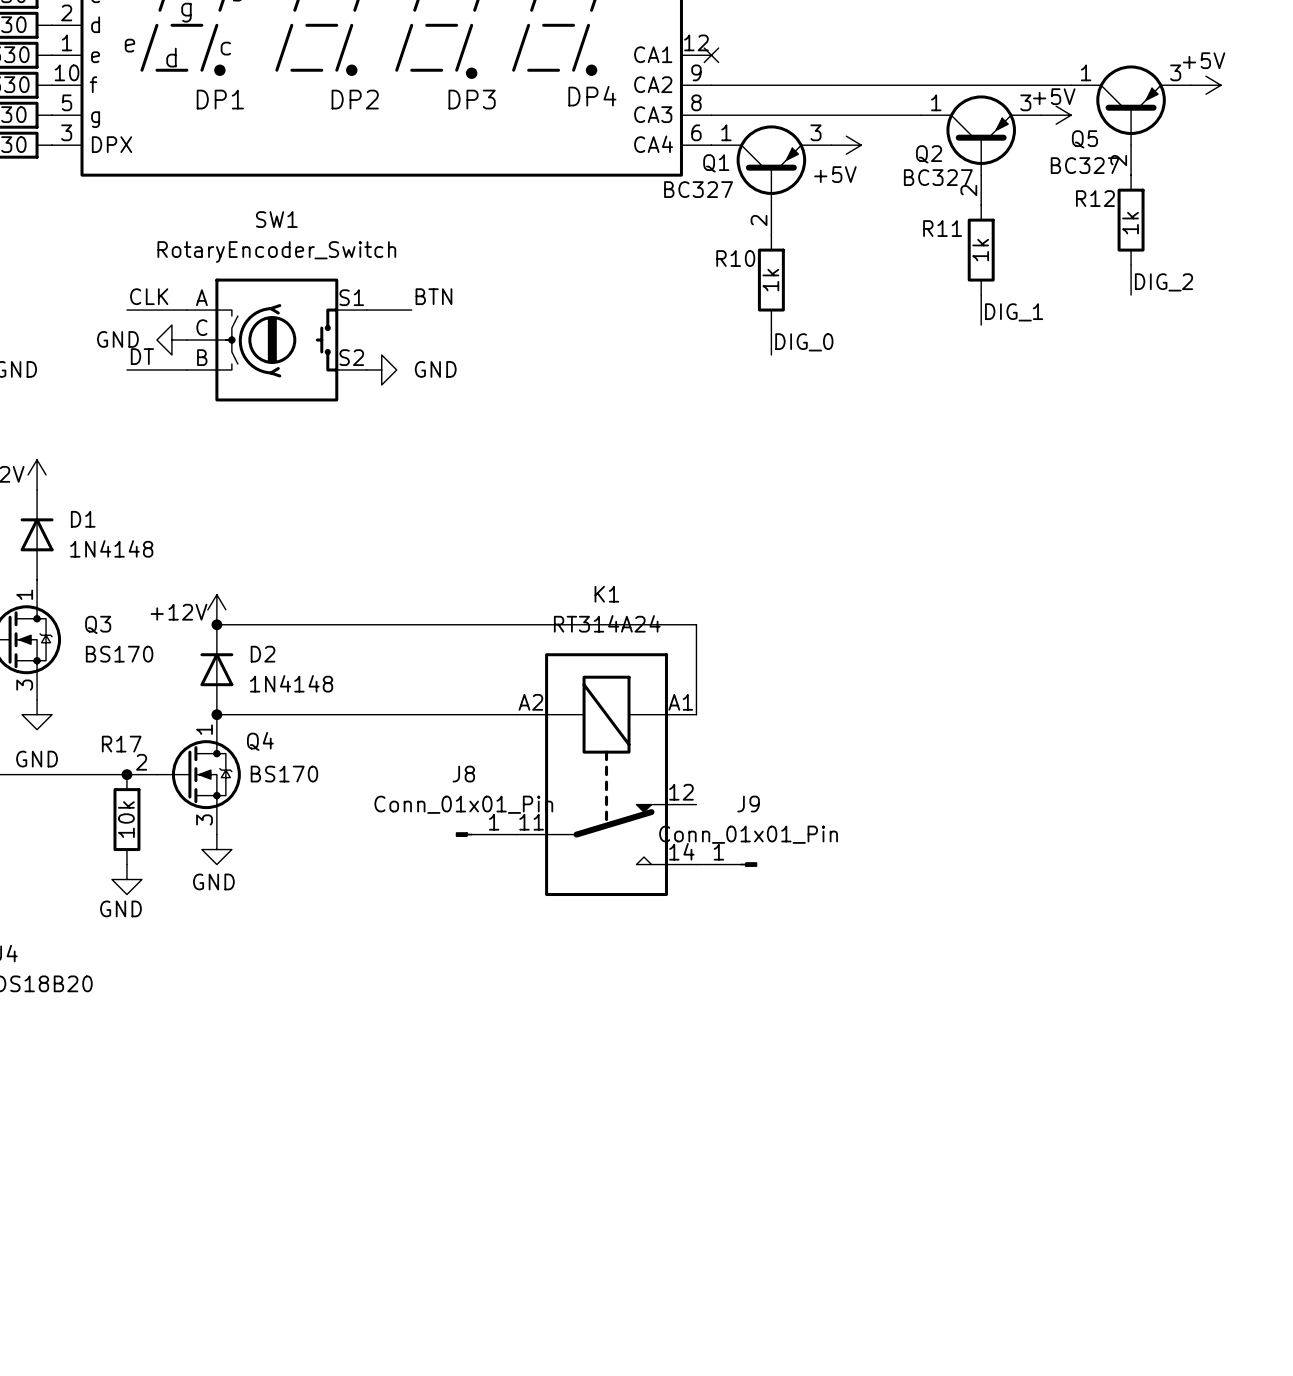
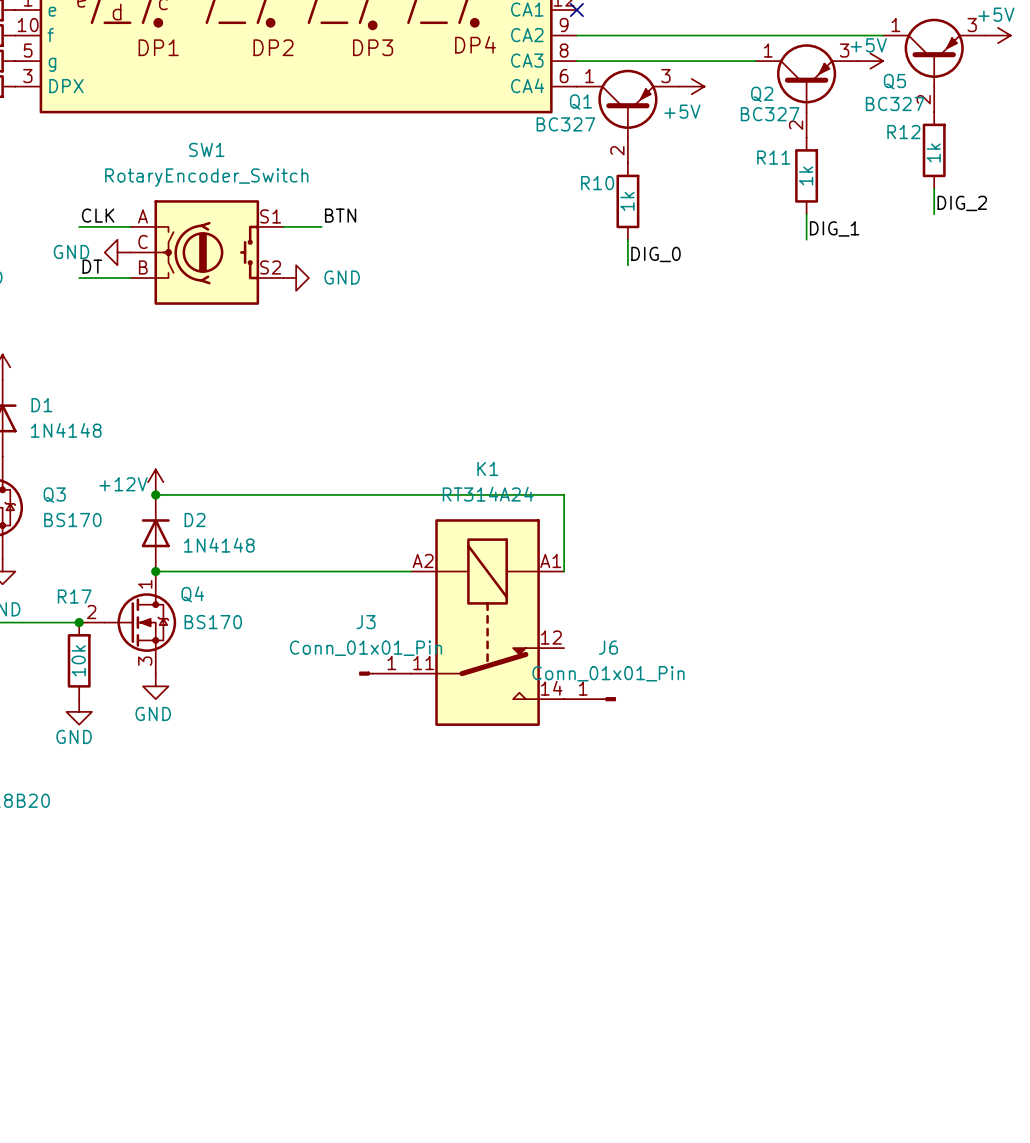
J8 name: J8 (463, 774) -> J3 (366, 622)
J9 name: J9 (748, 804) -> J6 (608, 647)

